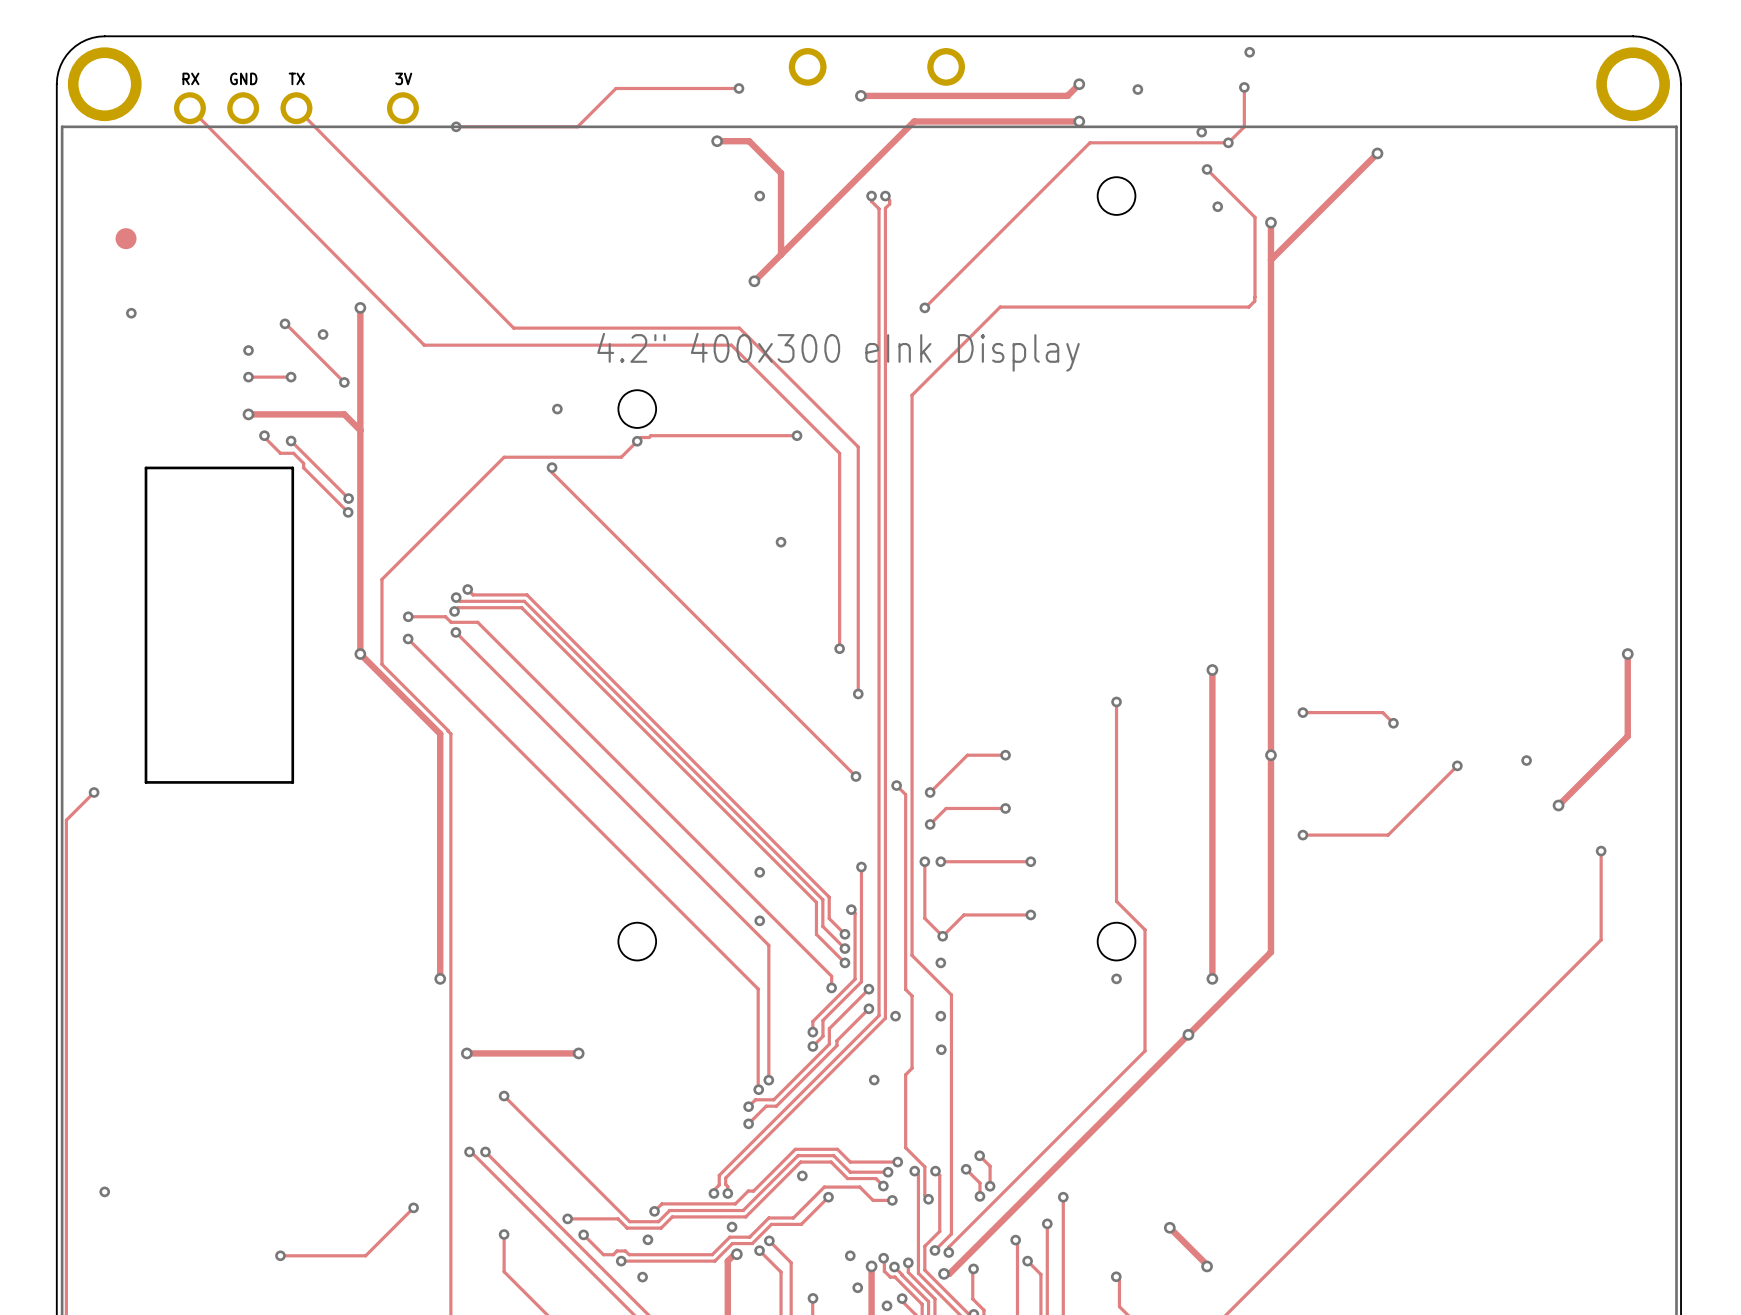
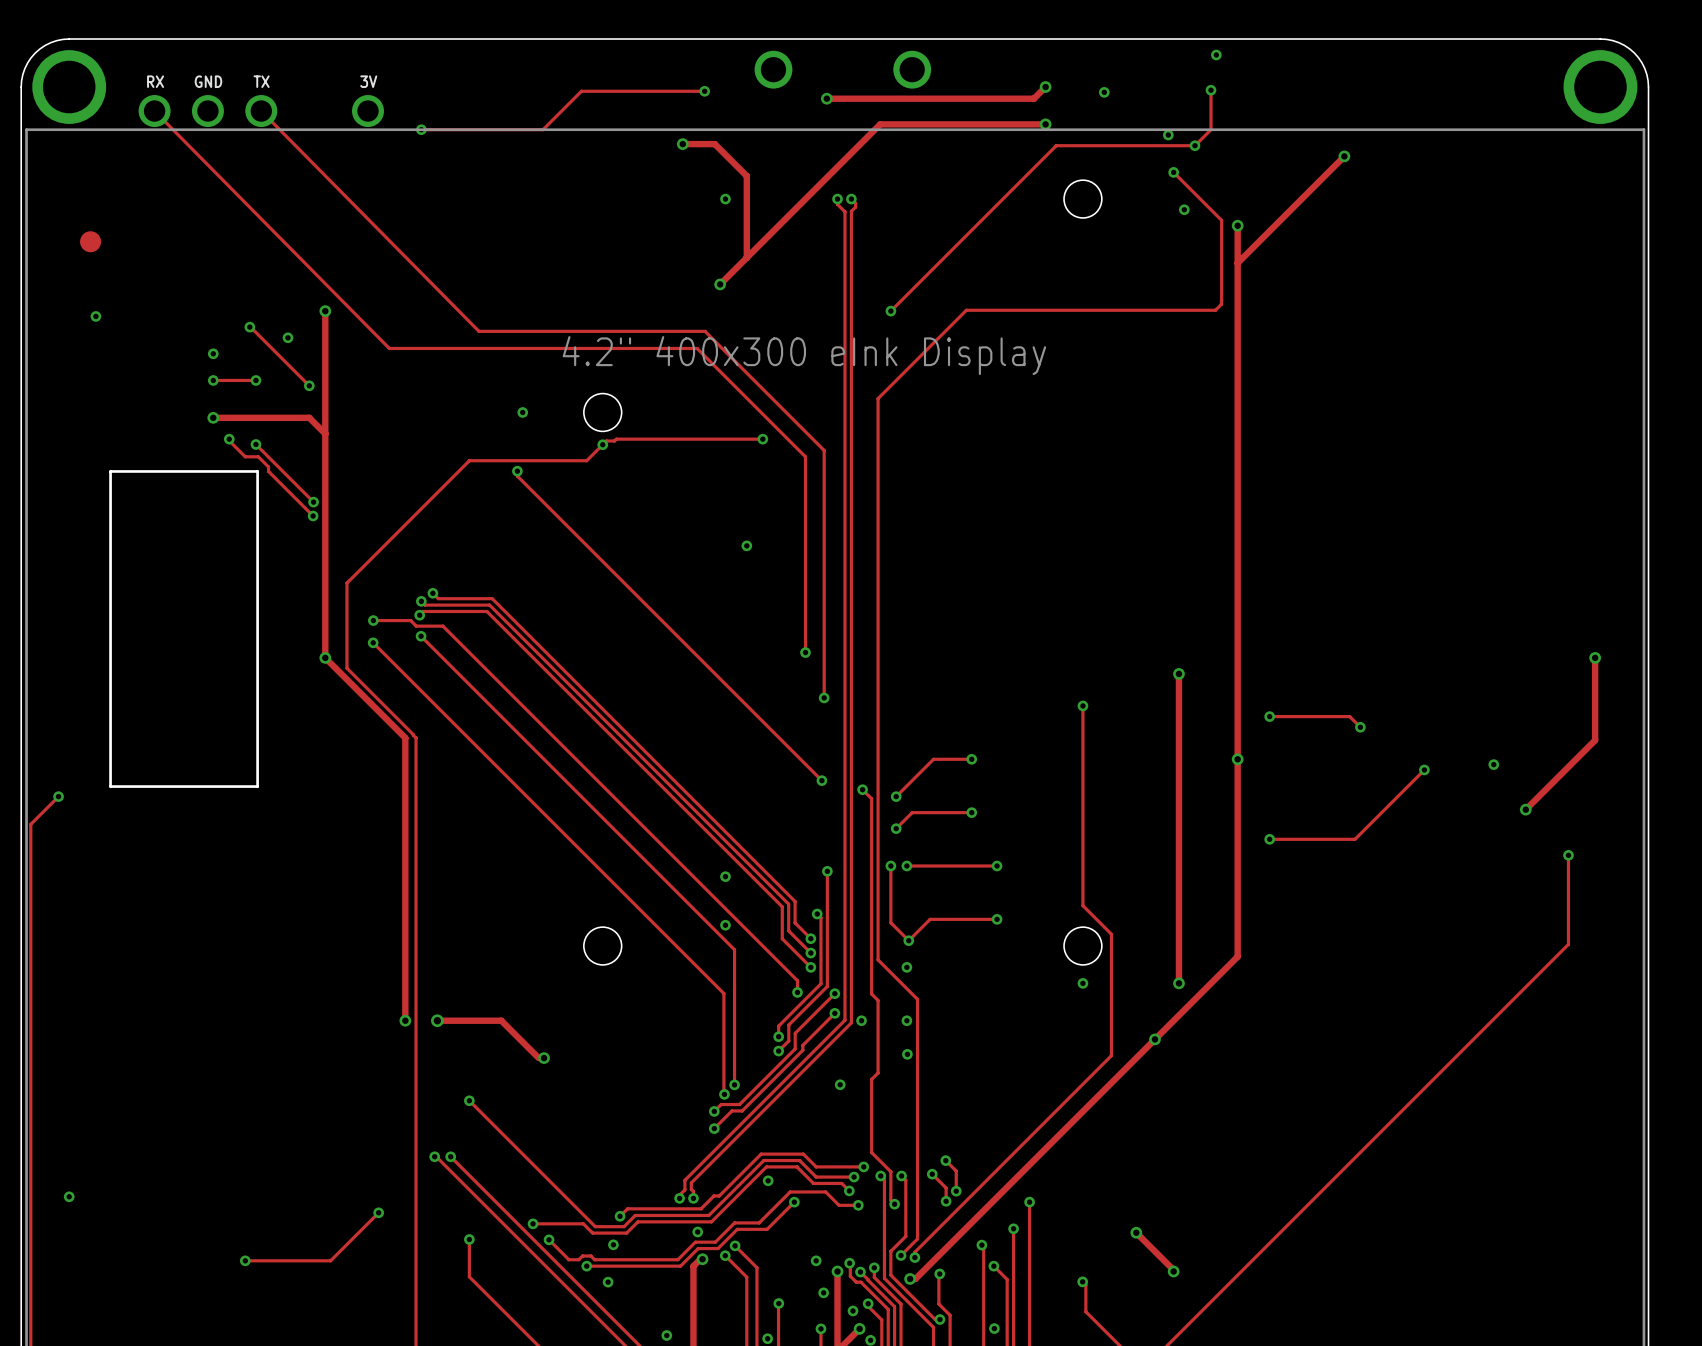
track: none -> (405, 983) (405, 1020)
via: (440, 978) -> none
via: none -> (405, 1020)
track: none -> (437, 1020) (501, 1020) (538, 1058)
via: none -> (437, 1020)
track: (466, 1053) (578, 1053) -> none
via: (466, 1053) -> none

